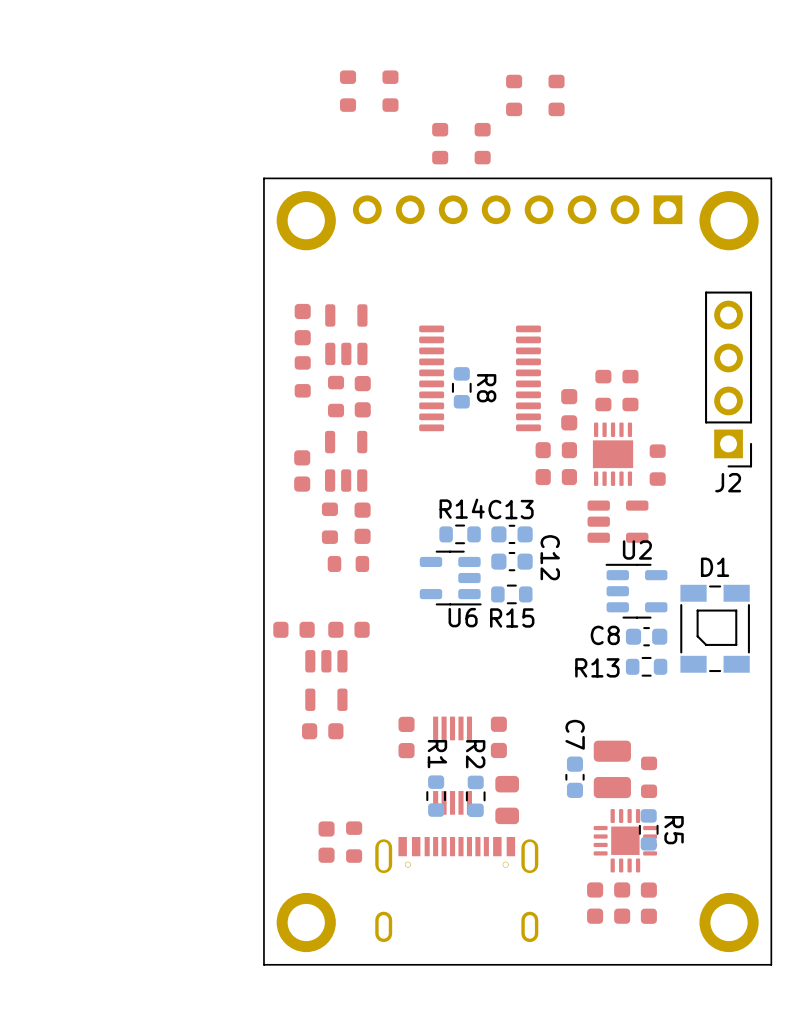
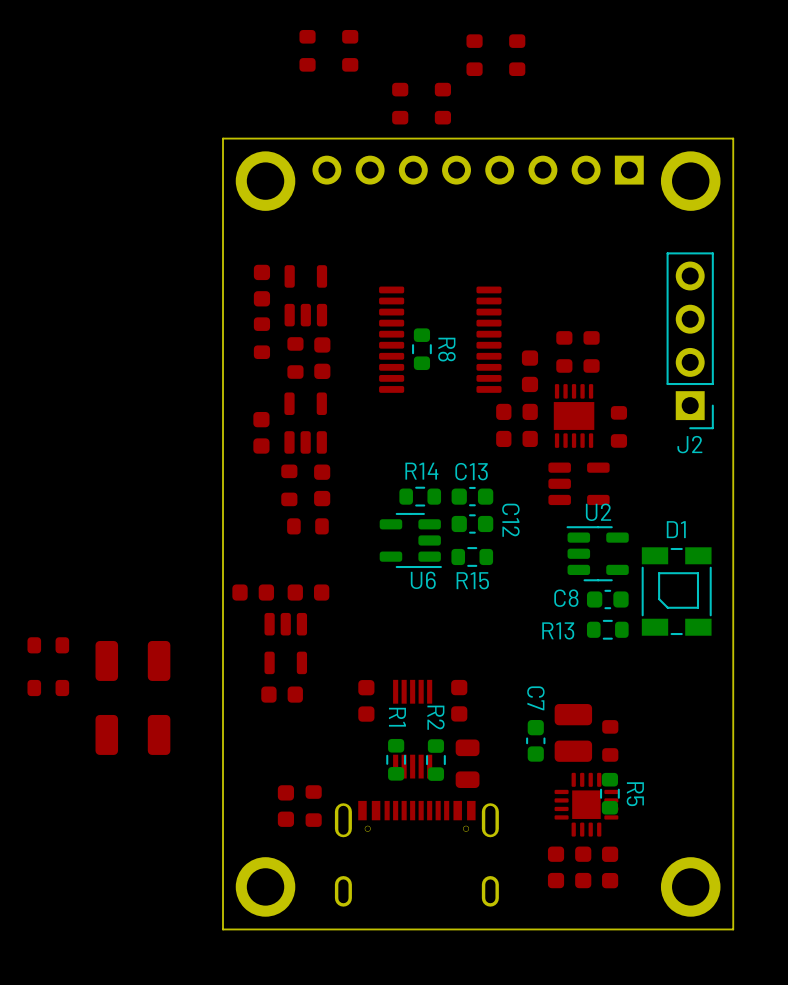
part: none -> (48, 645)
part: none -> (132, 660)
part: none -> (48, 688)
part: none -> (132, 734)

